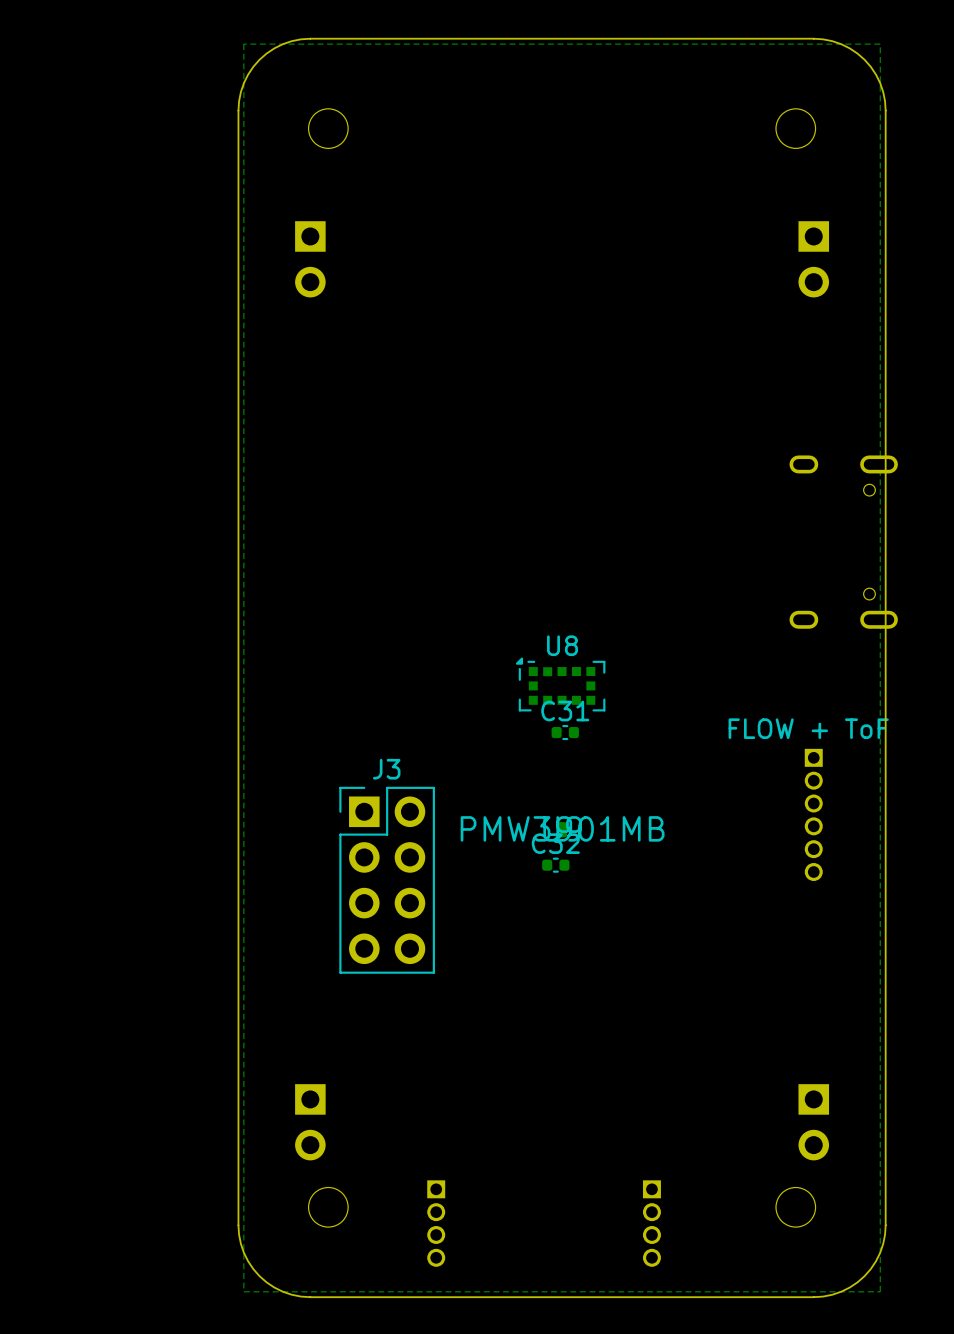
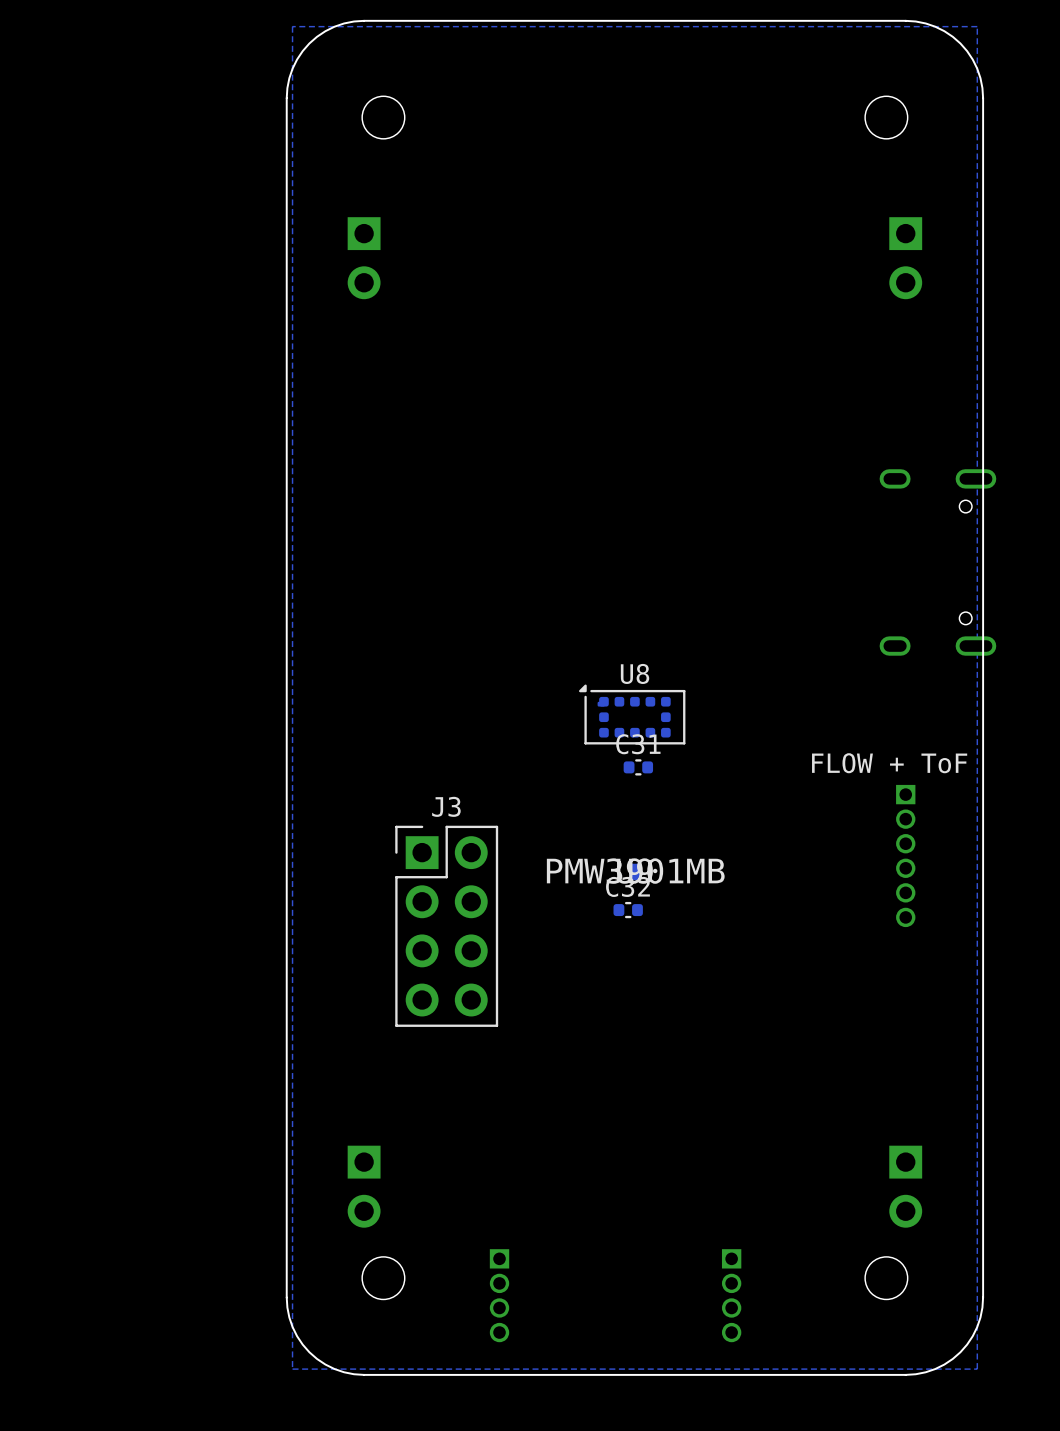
U8 footprint: [515, 657, 606, 712] -> [579, 684, 686, 745]

